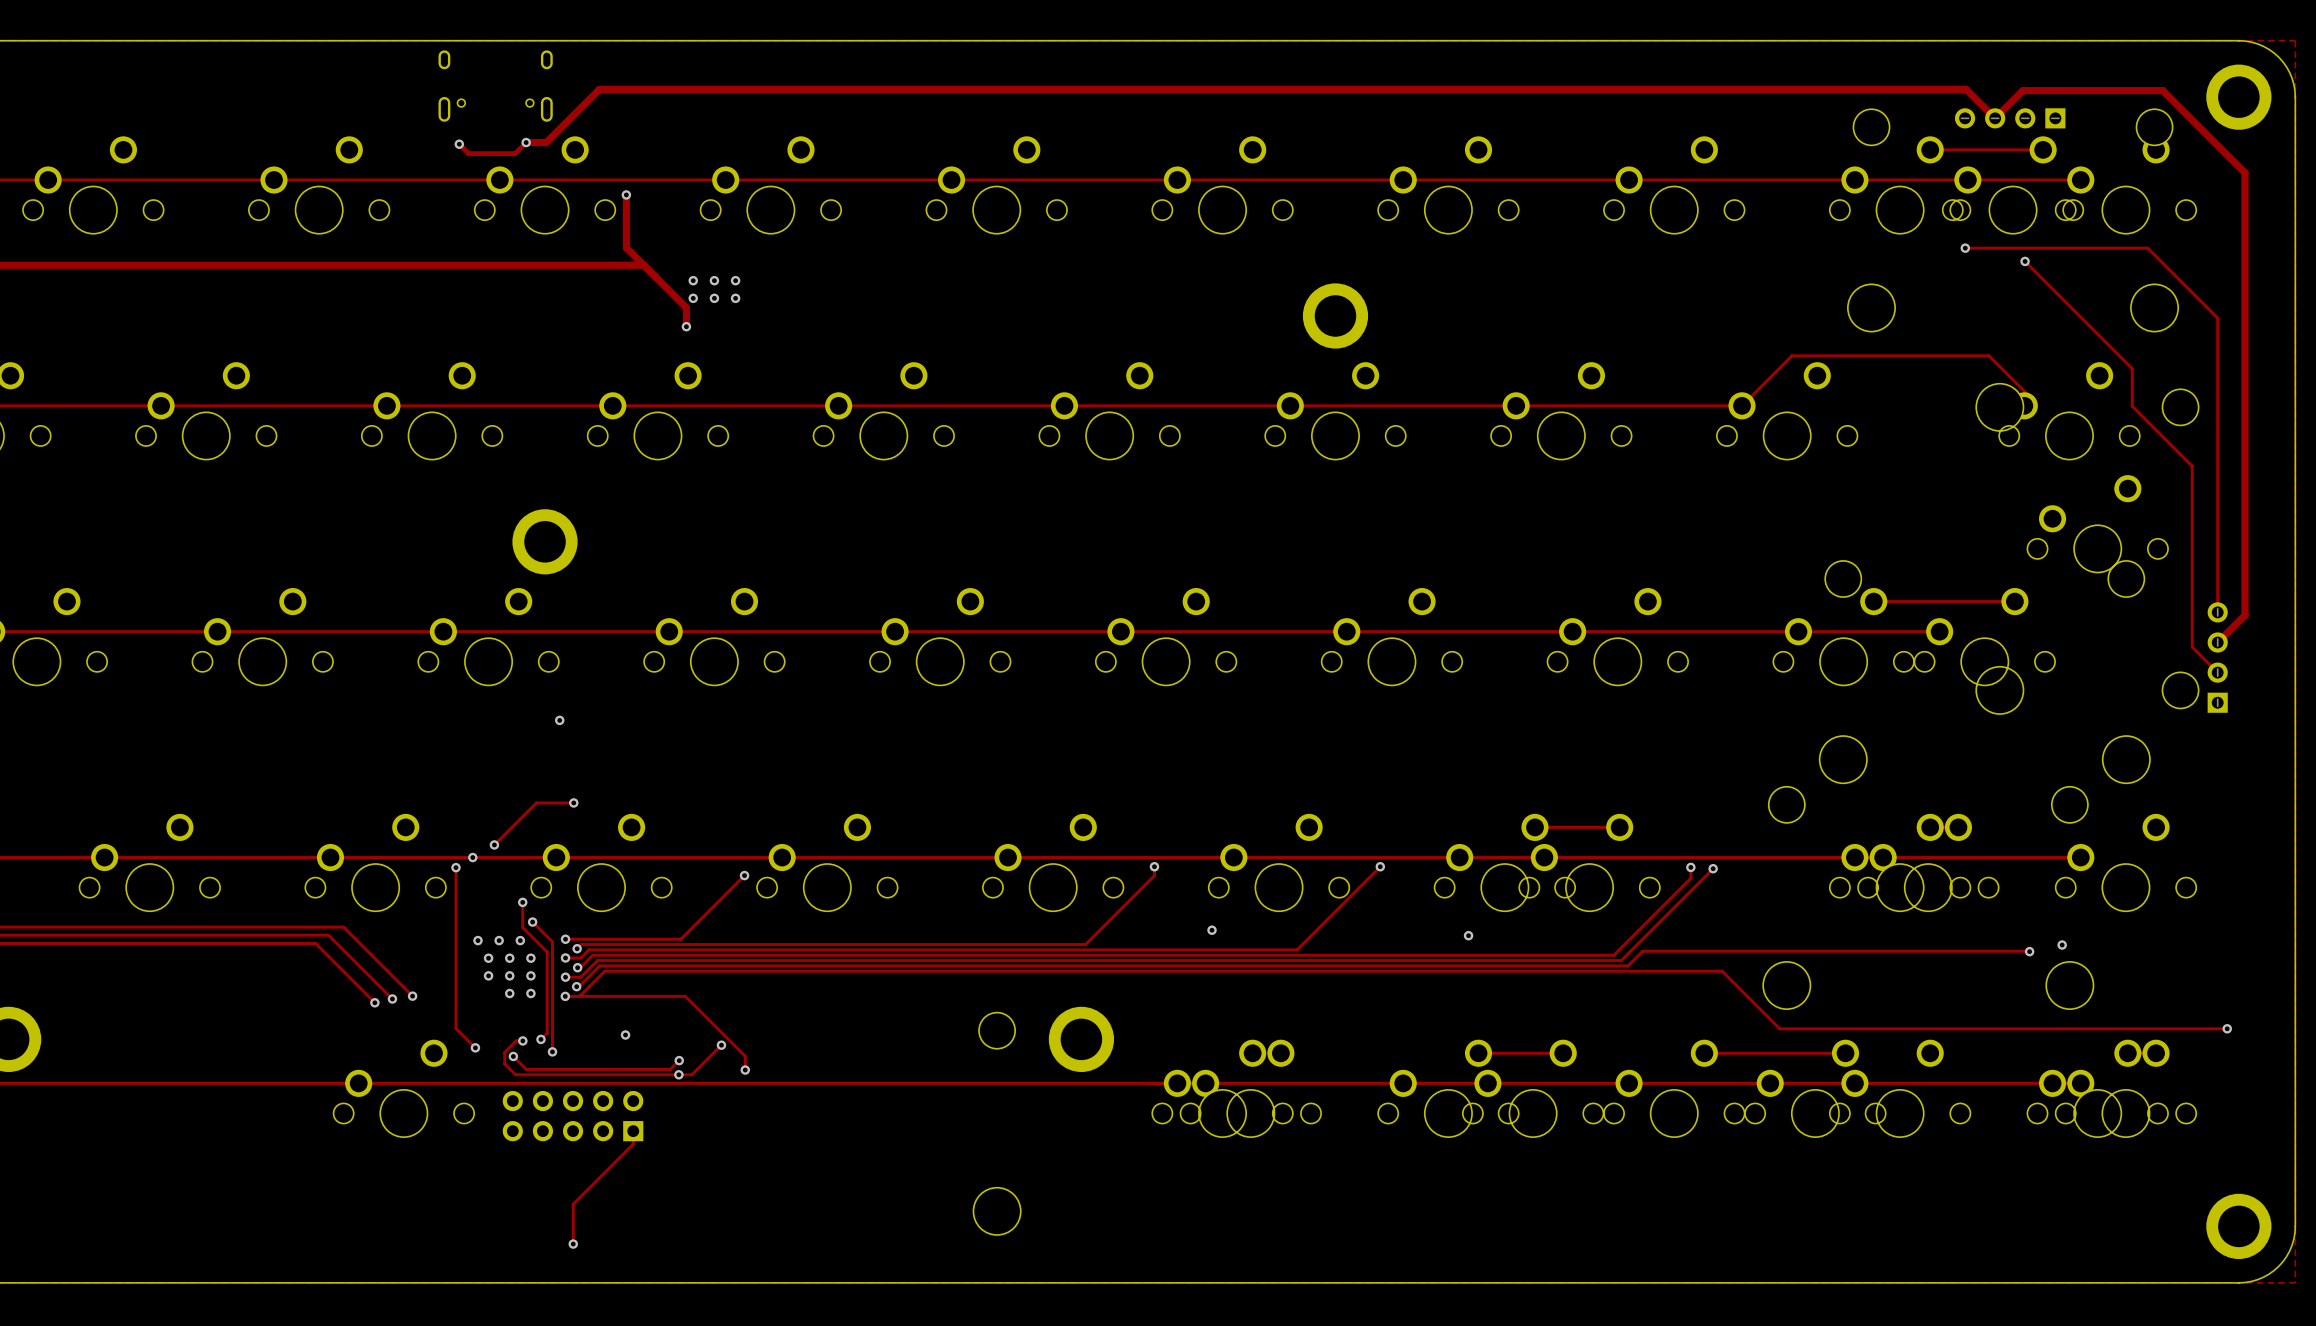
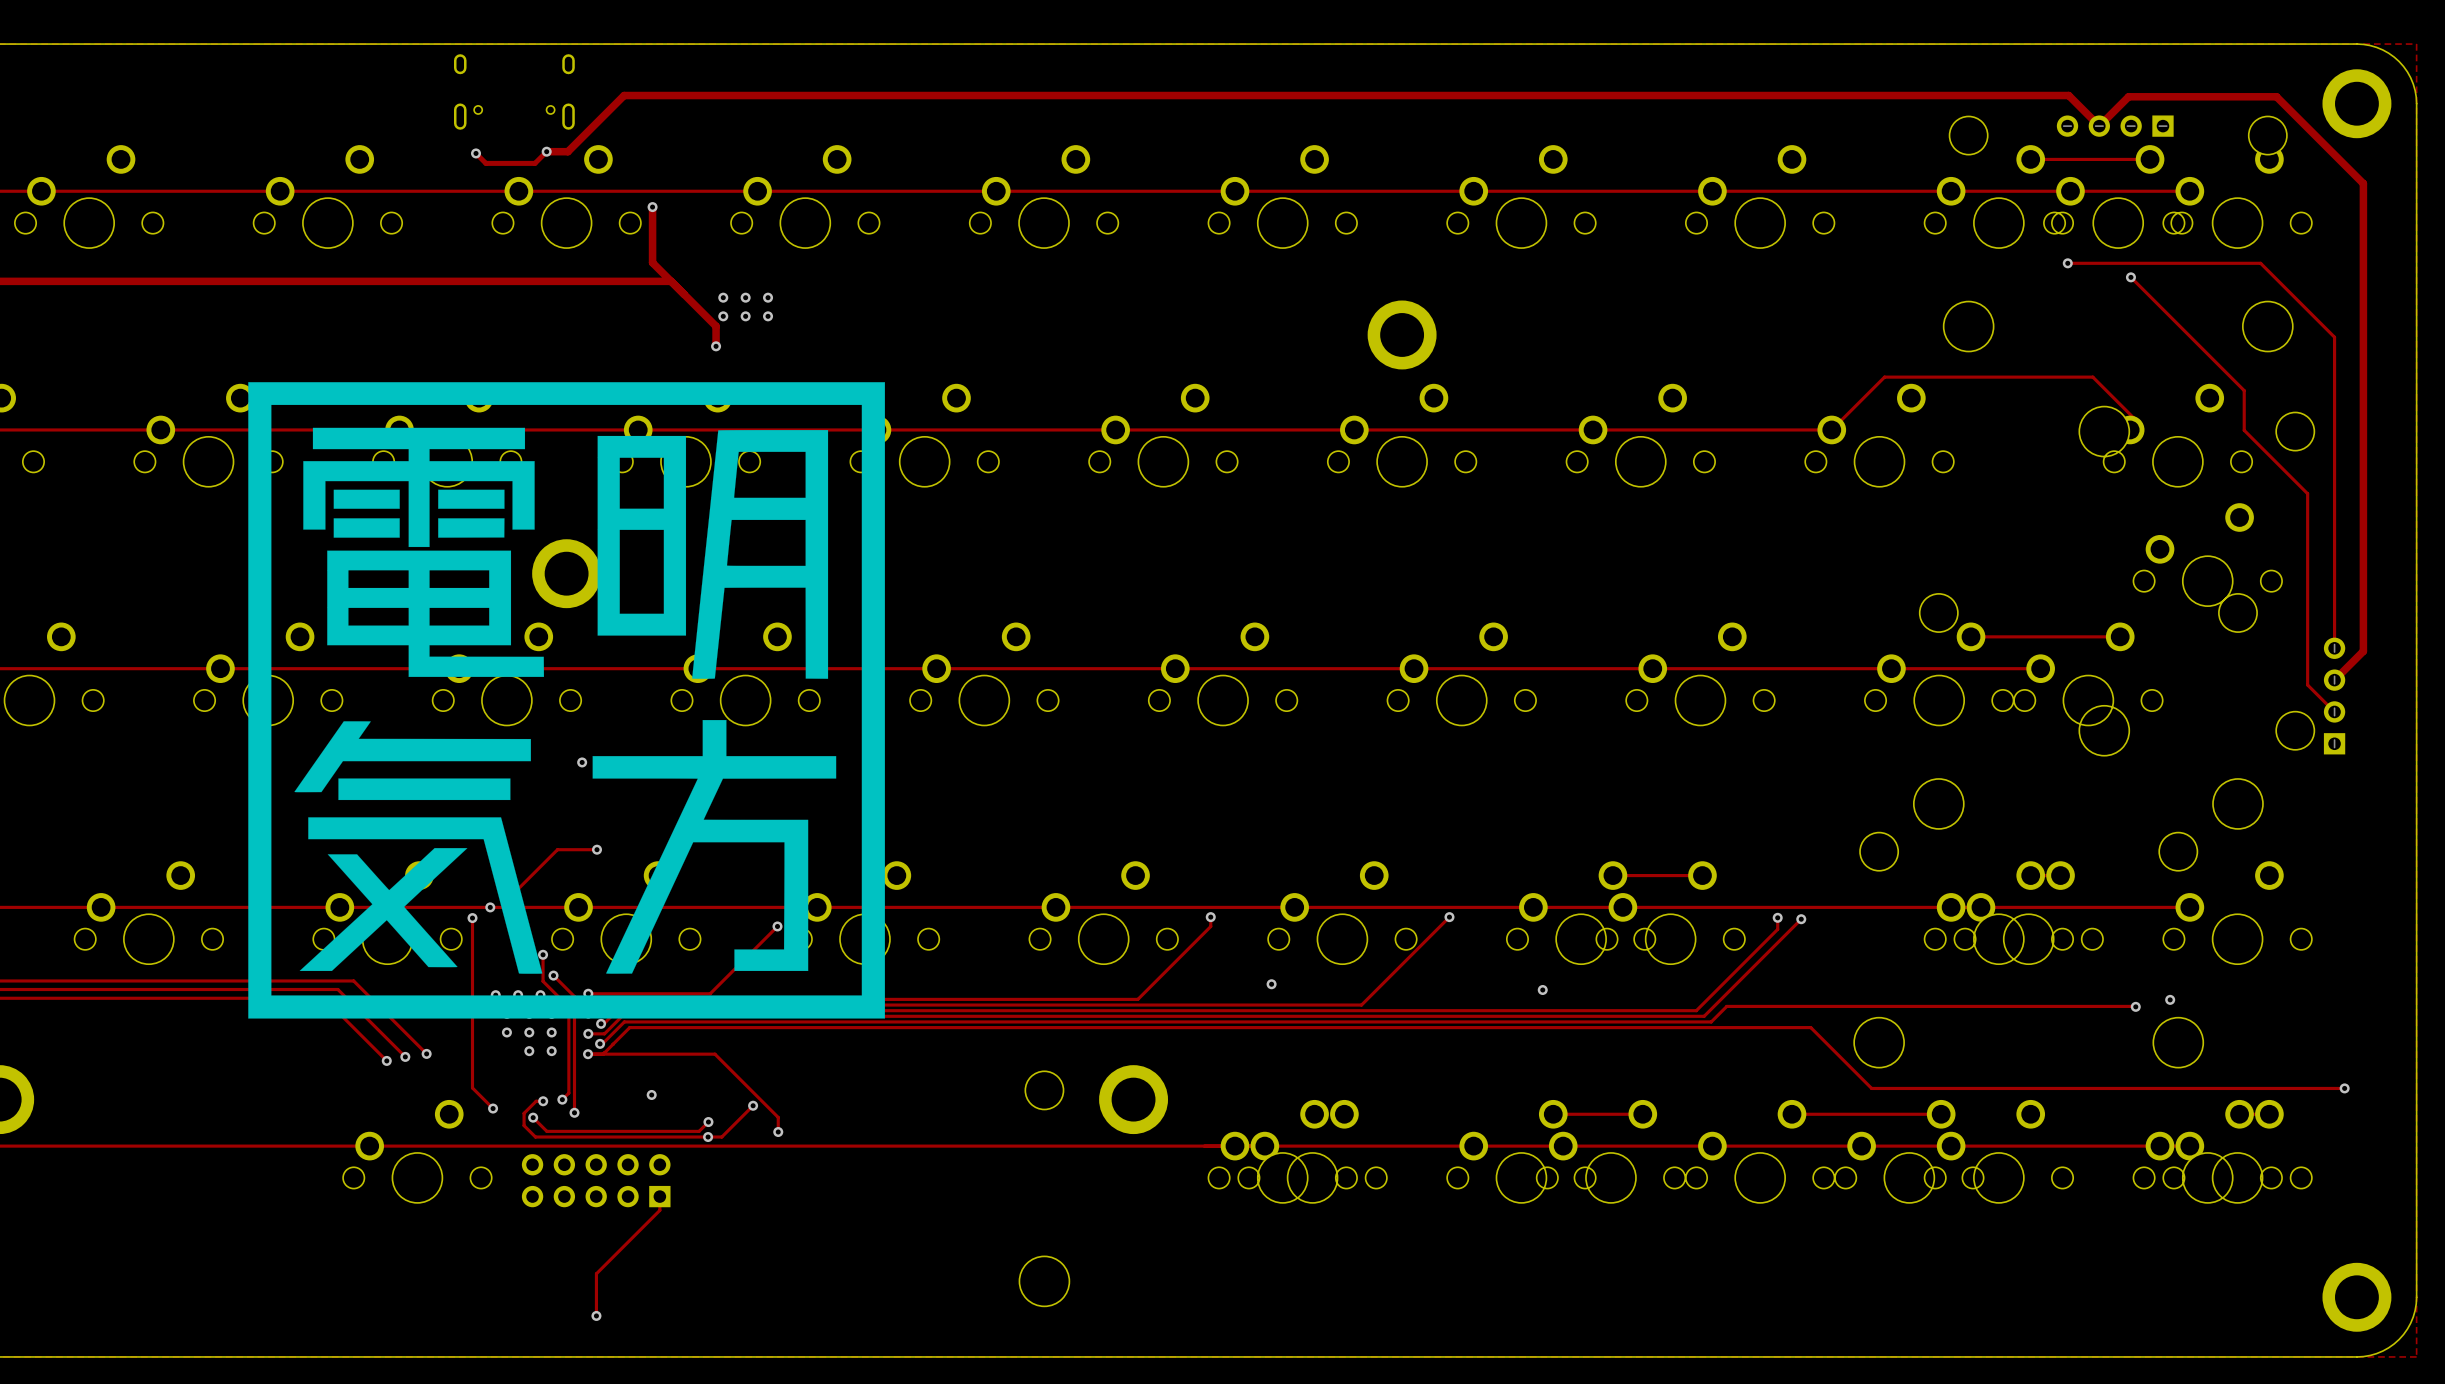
drawing: none -> [248, 382, 885, 1019]

